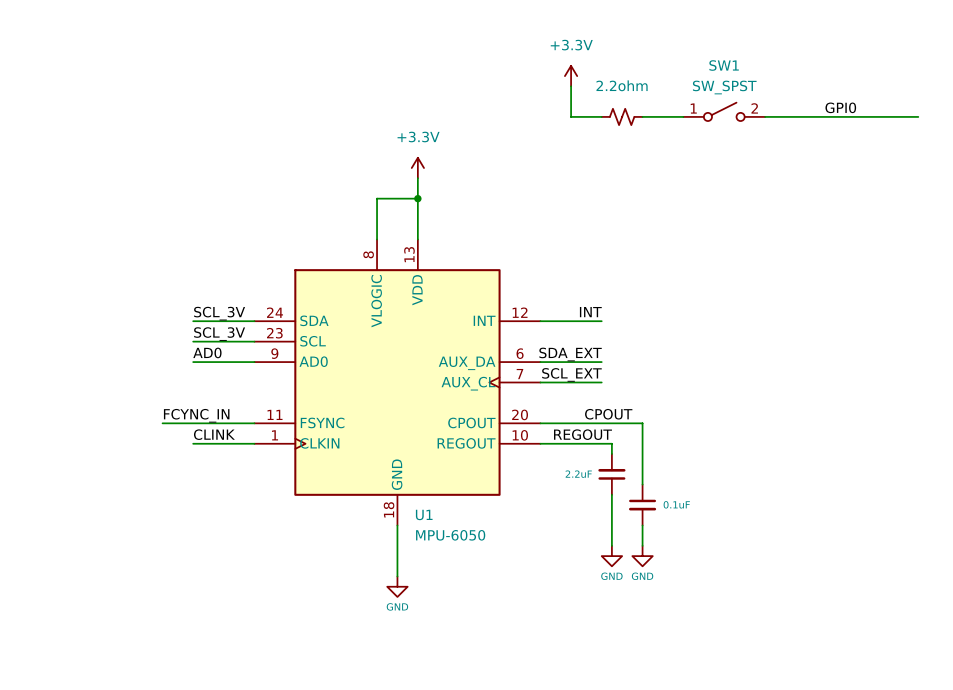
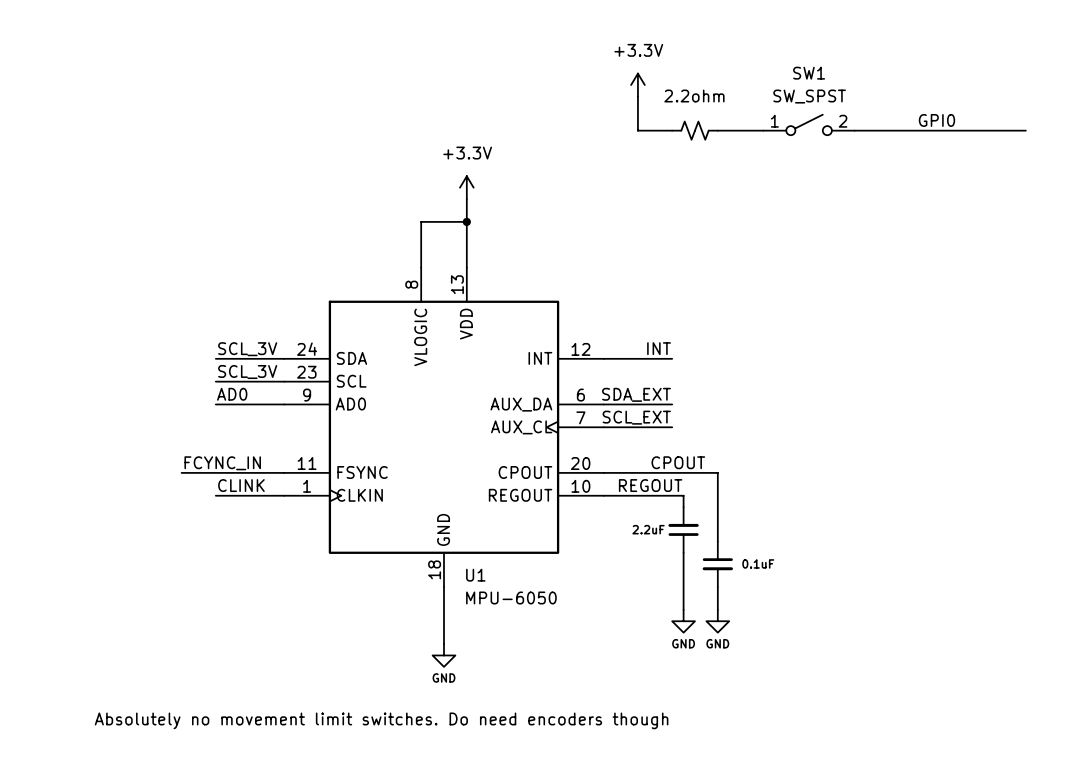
text: none -> Absolutely no movement limit switches. Do need encoders though (381, 720)

